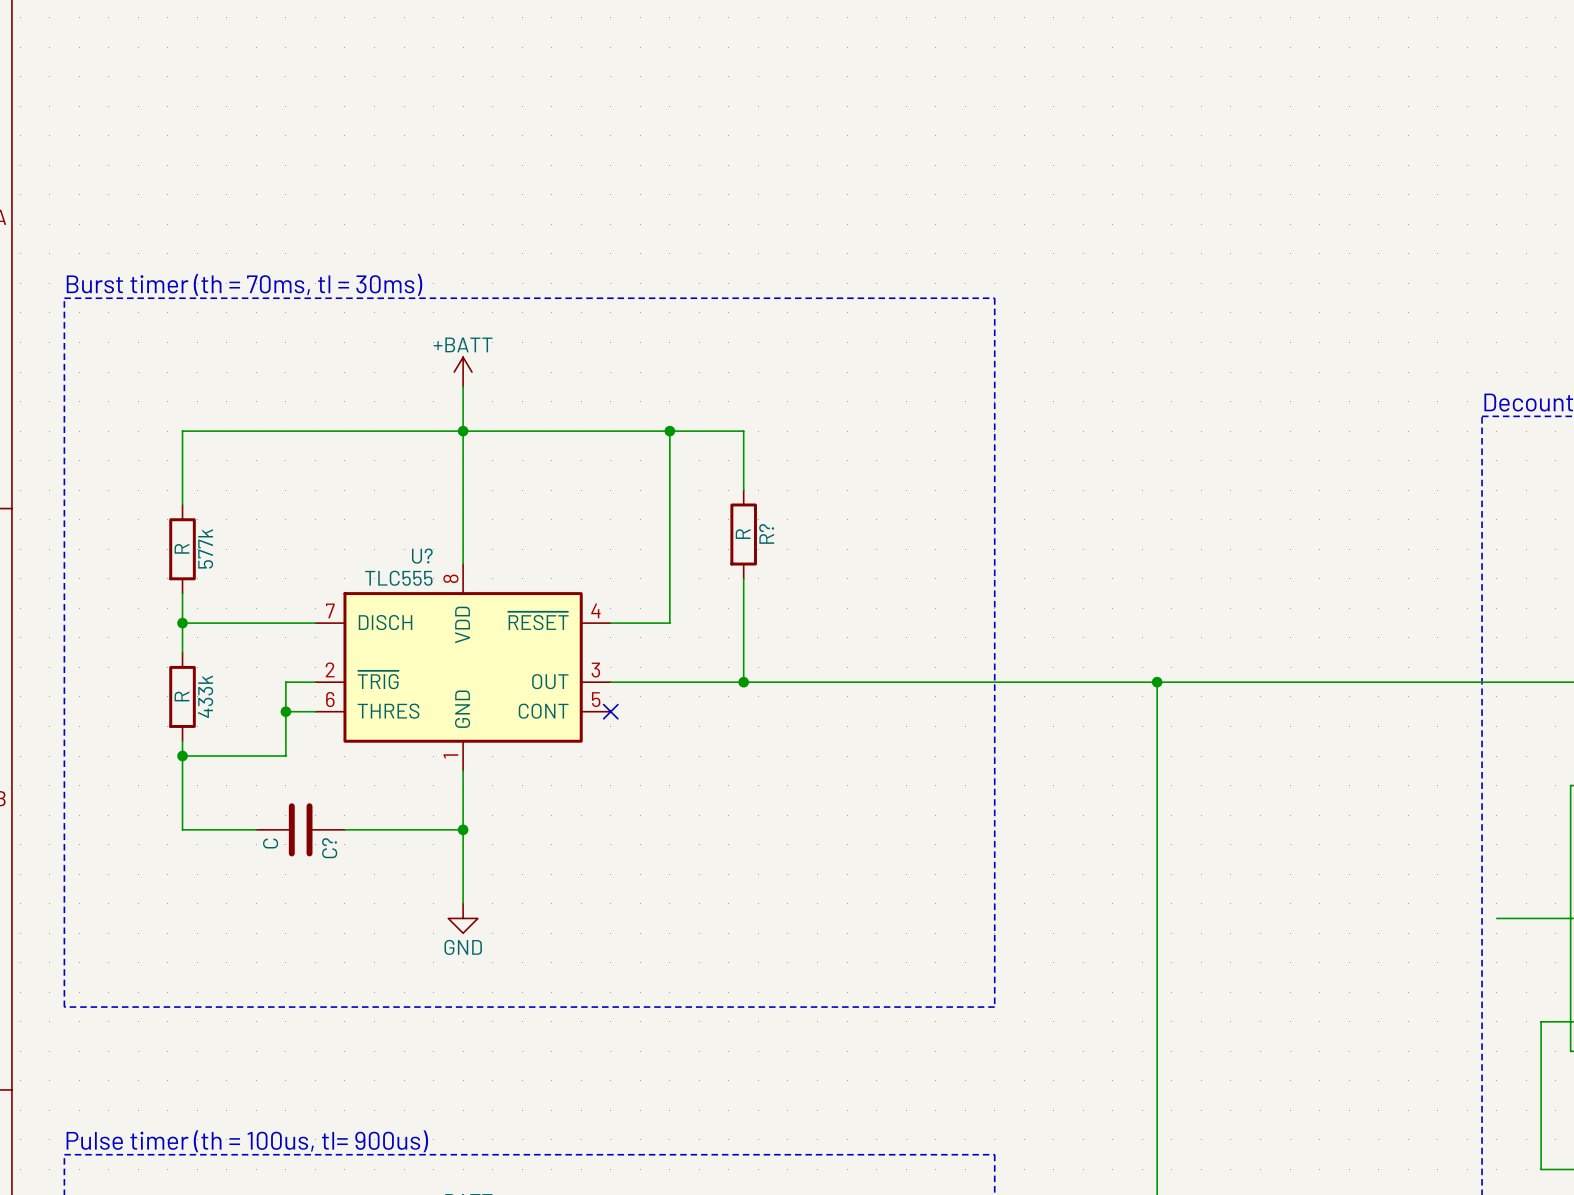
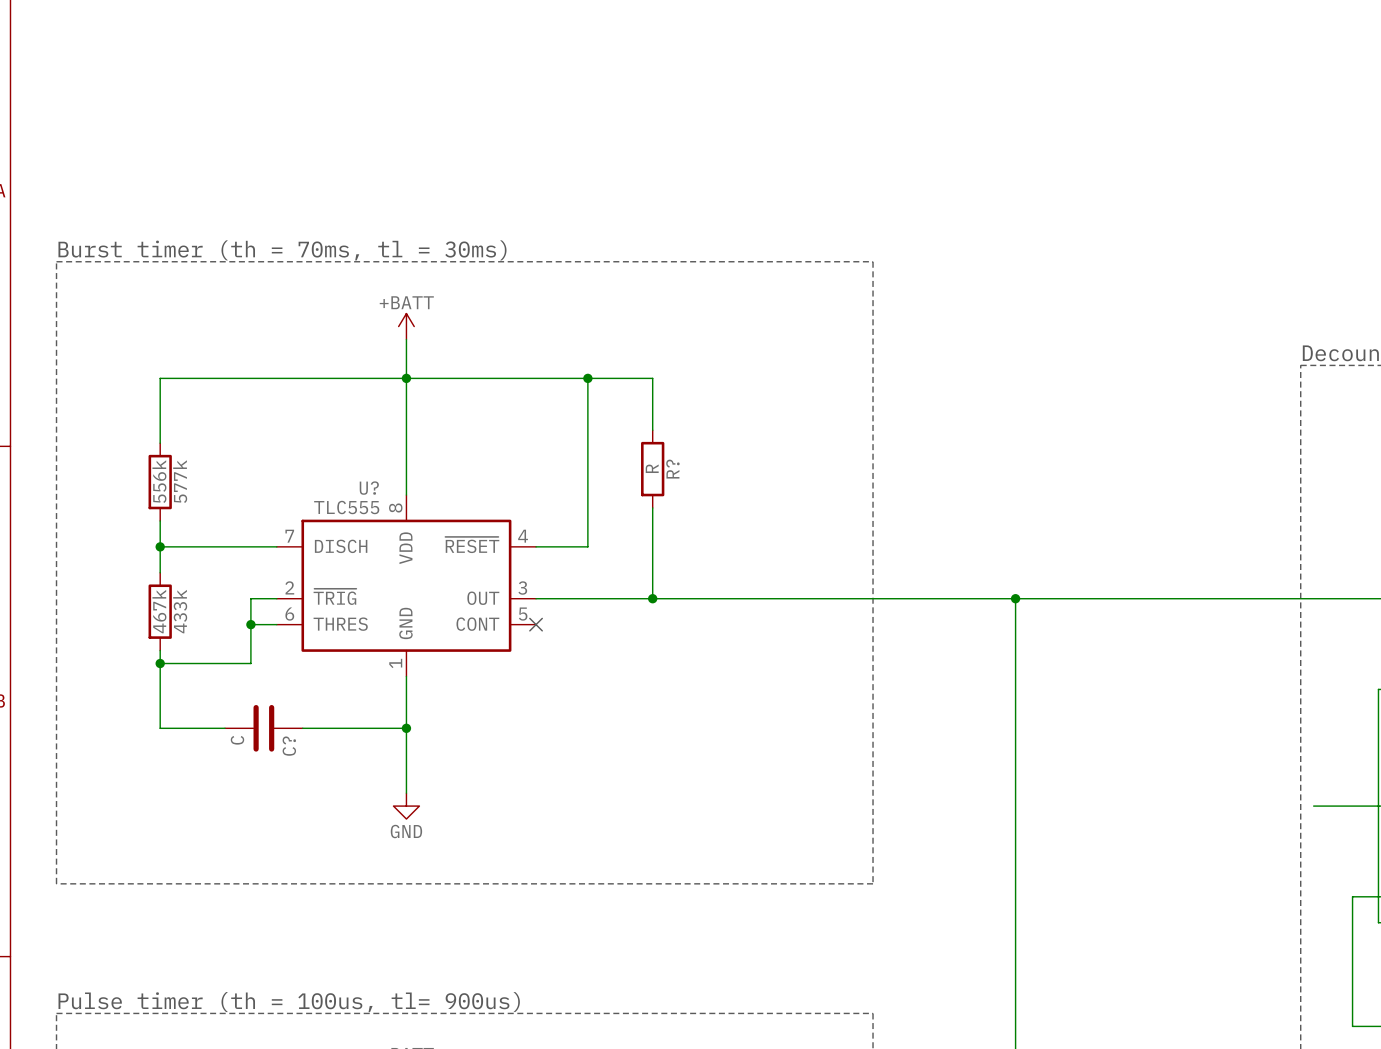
577k value: R (181, 548) -> 556k (159, 481)
433k value: R (181, 696) -> 467k (159, 611)

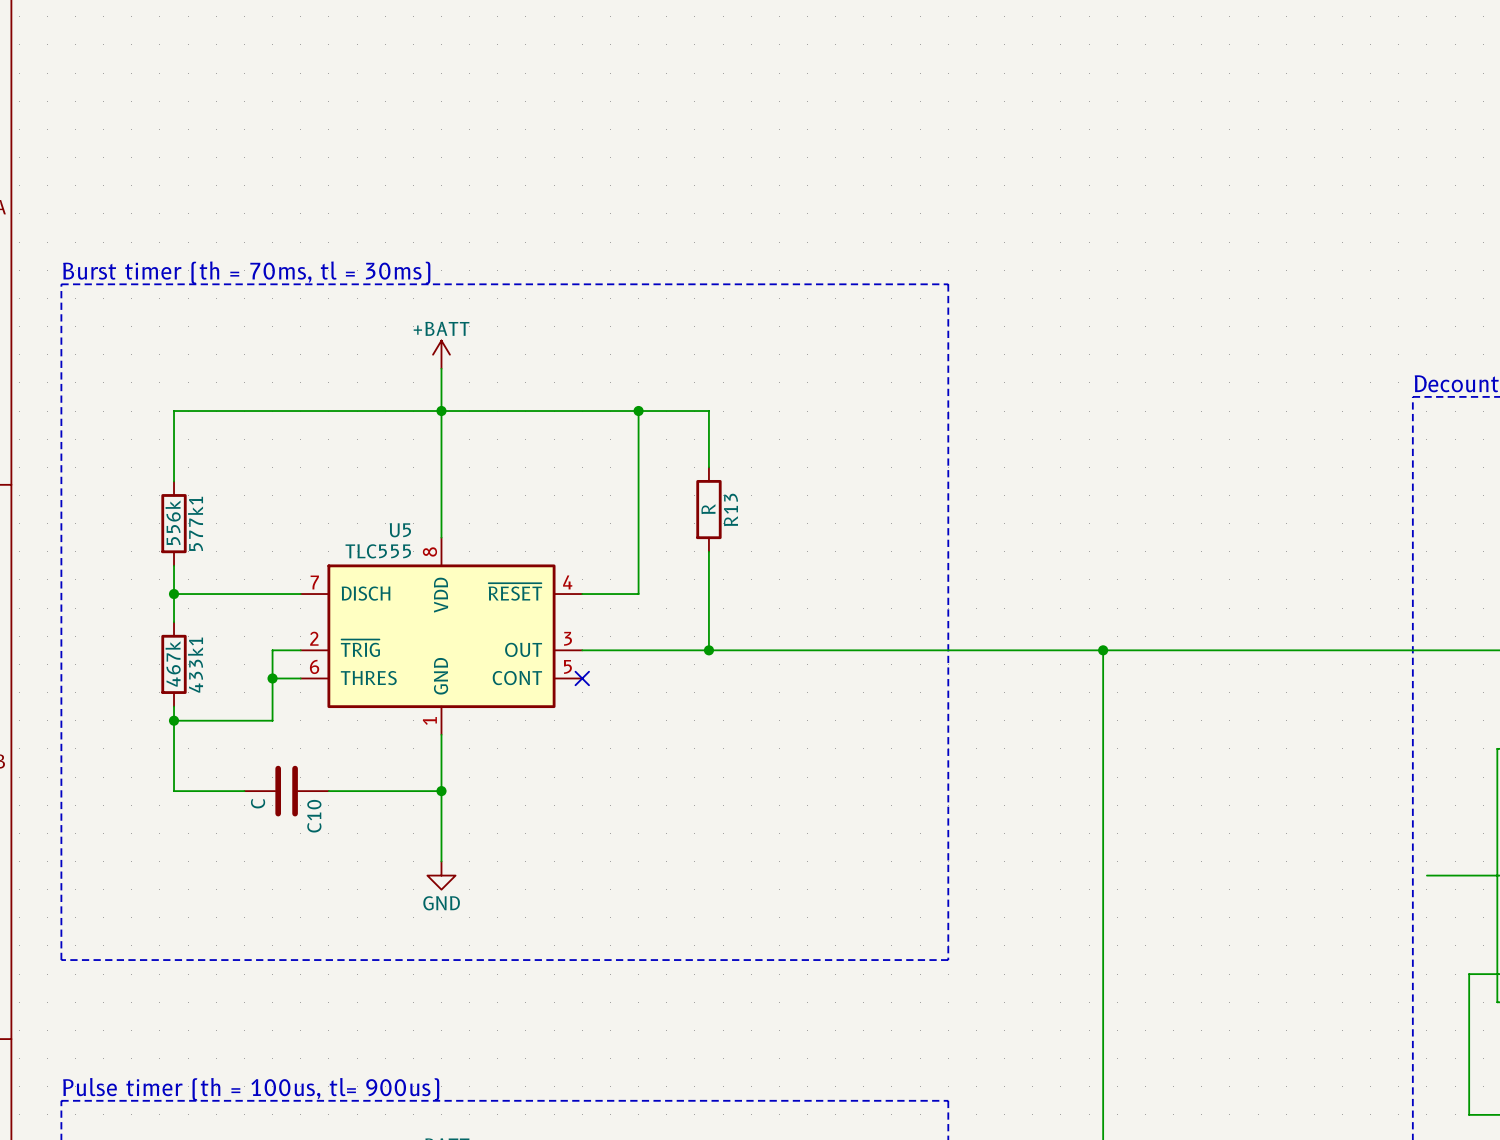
R? name: R? (672, 469) -> R13 (730, 509)
577k name: 577k (180, 481) -> 577k1 (195, 523)
U? name: U? (369, 488) -> U5 (400, 530)
433k name: 433k (180, 611) -> 433k1 (195, 665)
C? name: C? (289, 746) -> C10 (314, 816)

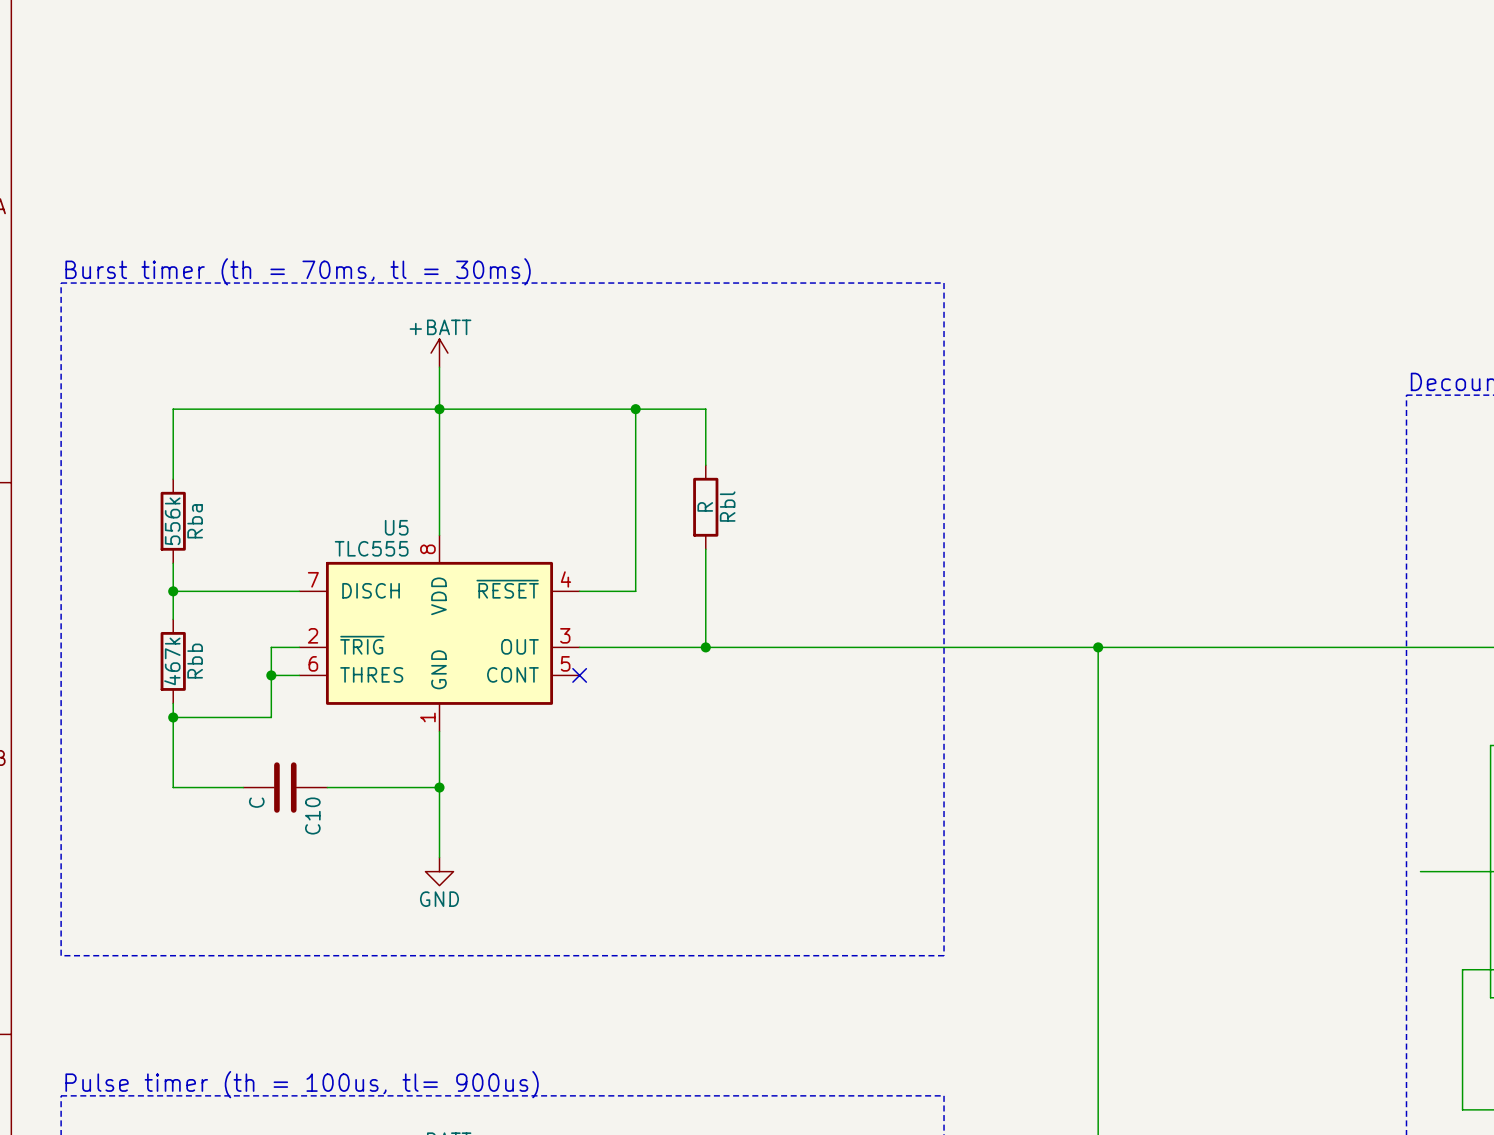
R13 name: R13 (730, 509) -> Rbl (727, 506)
577k1 name: 577k1 (195, 523) -> Rba (195, 521)
433k1 name: 433k1 (195, 665) -> Rbb (195, 661)

